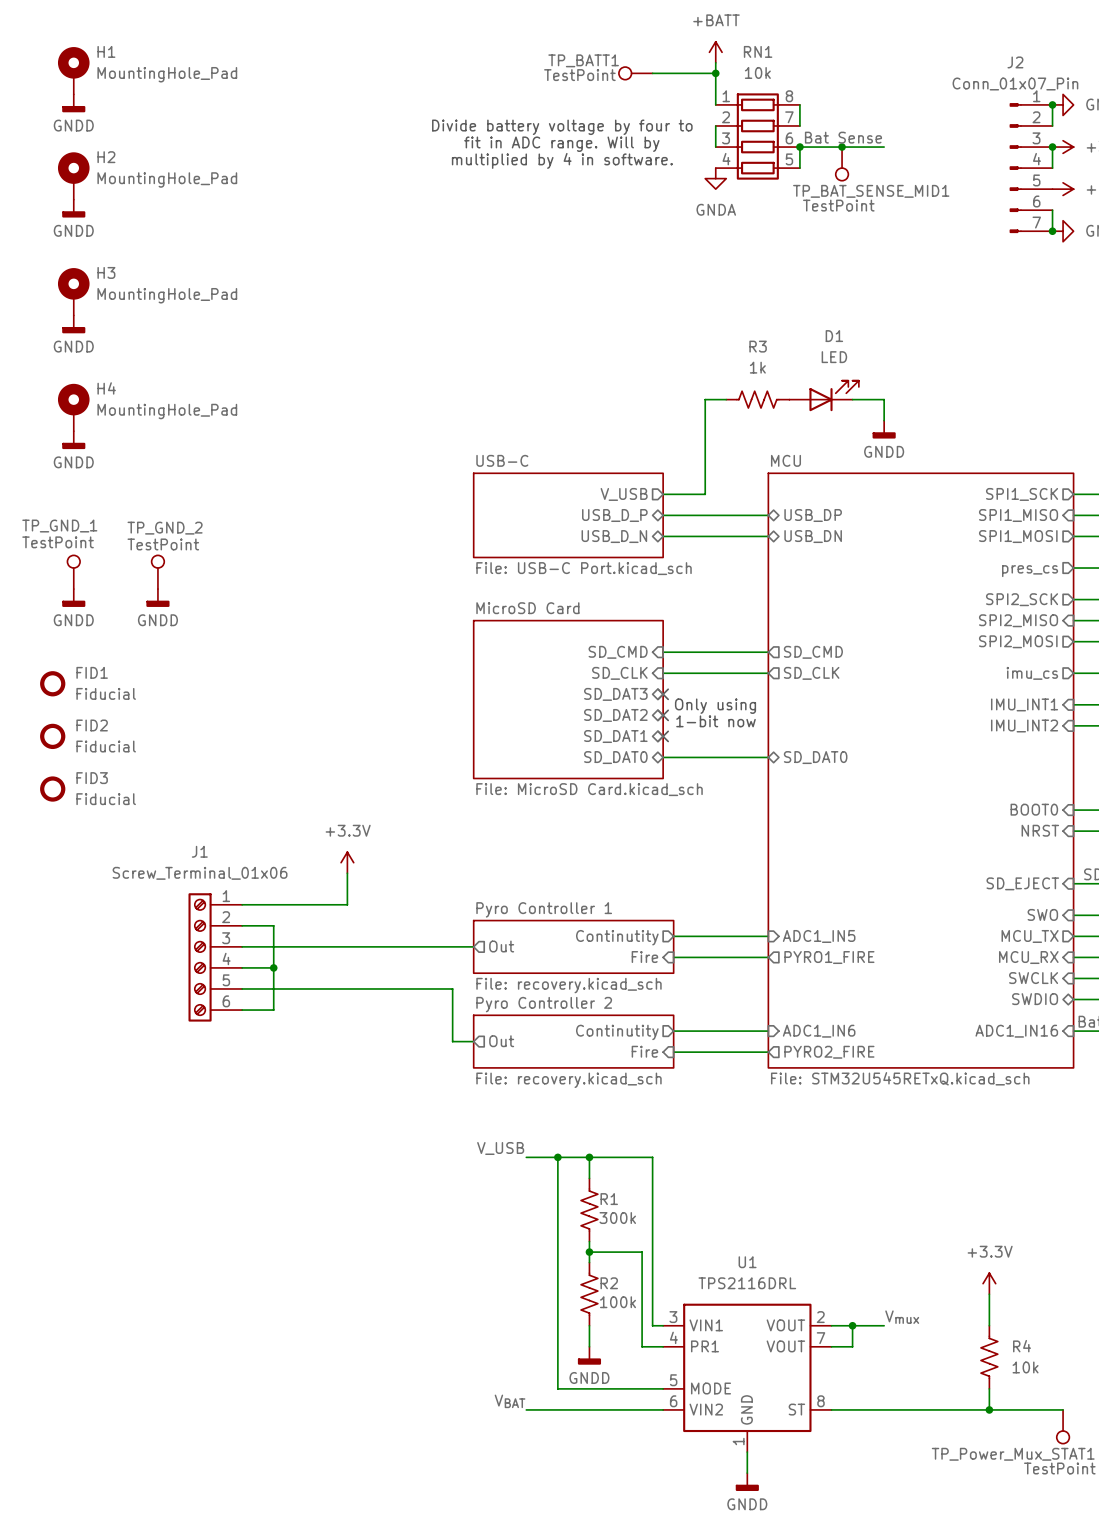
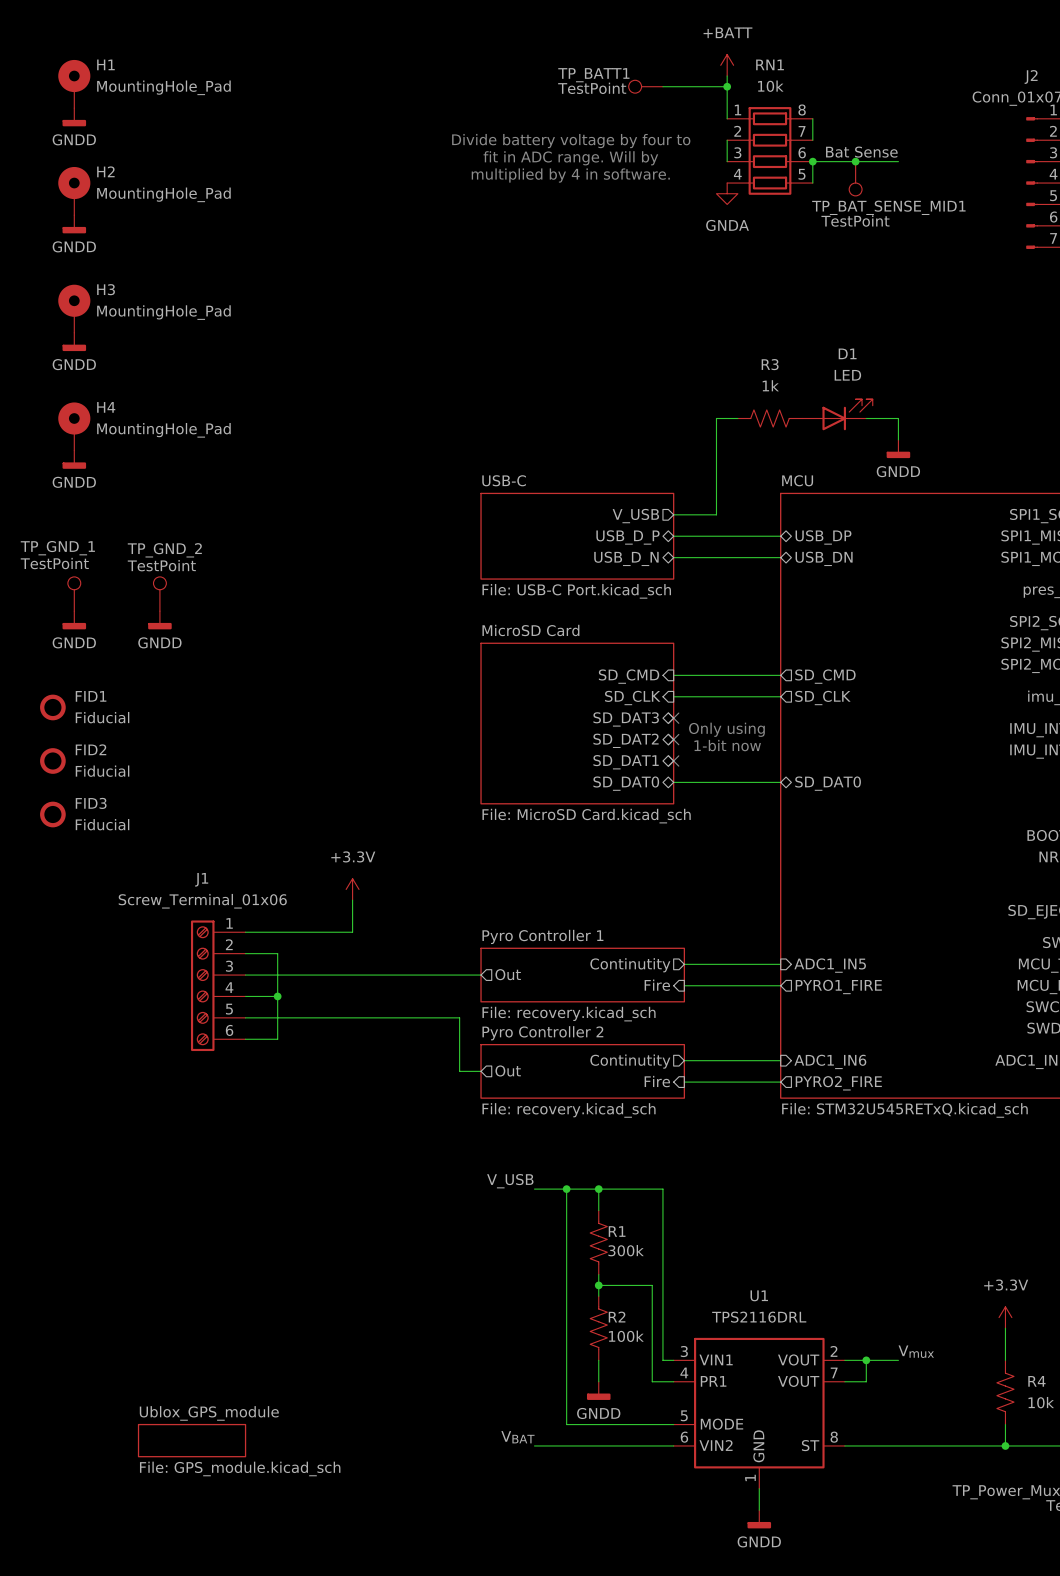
sheet Ublox_GPS_module: none -> File: GPS_module.kicad_sch (192, 1440)

